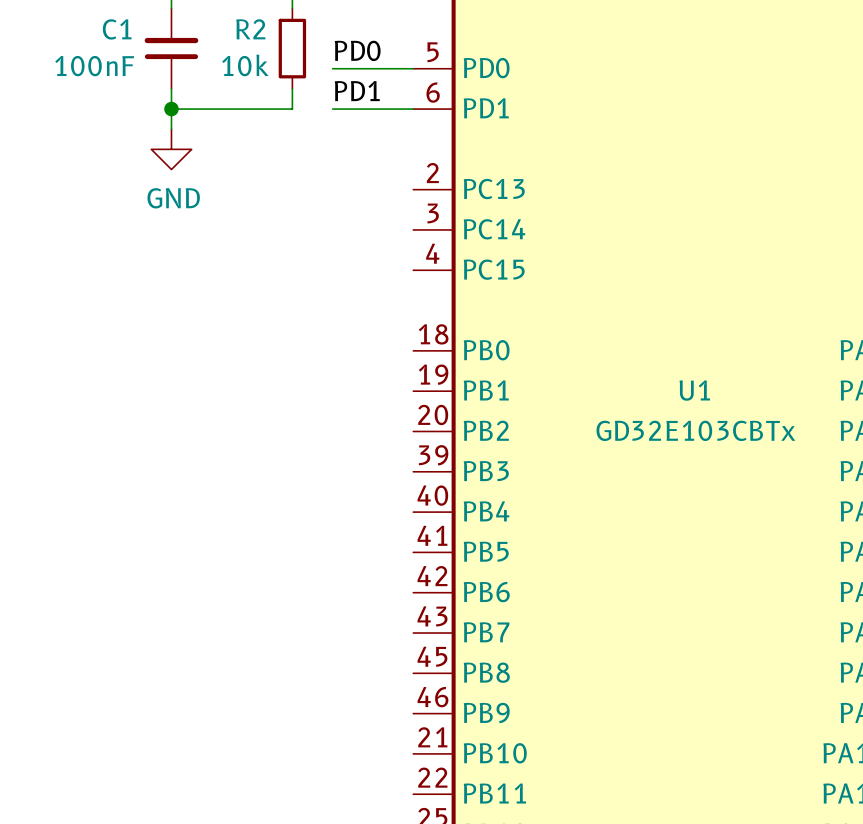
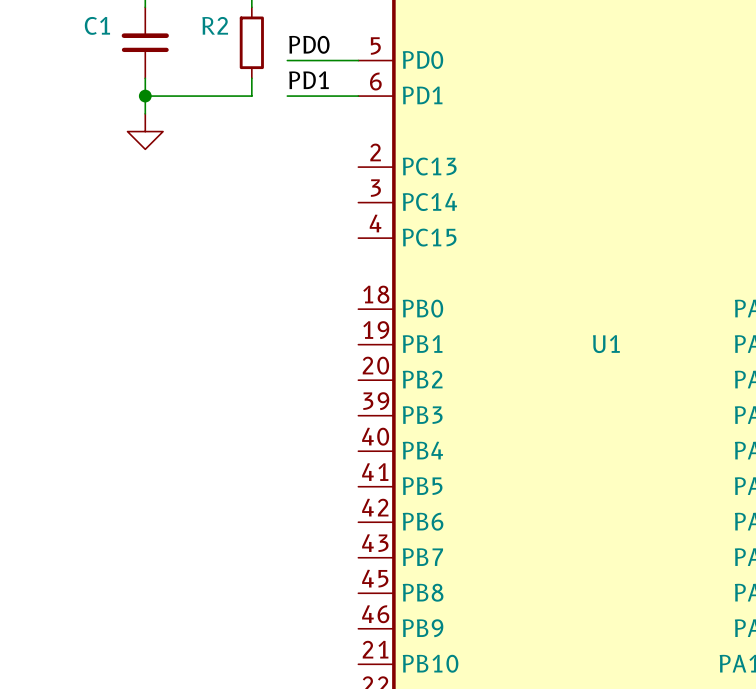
R2 value: 10k (245, 65) -> none
C1 value: 100nF (94, 66) -> none
power symbol text: GND (173, 198) -> none
U1 value: GD32E103CBTx (695, 430) -> none

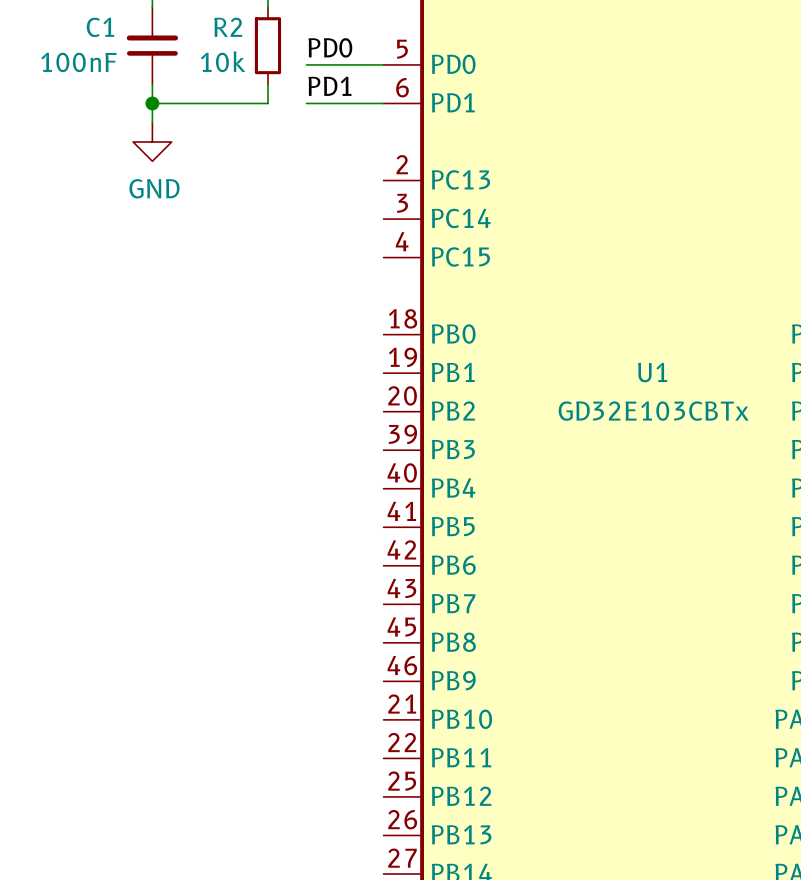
R2 value: none -> 10k (223, 61)
C1 value: none -> 100nF (78, 62)
power symbol text: none -> GND (154, 188)
U1 value: none -> GD32E103CBTx (653, 411)

